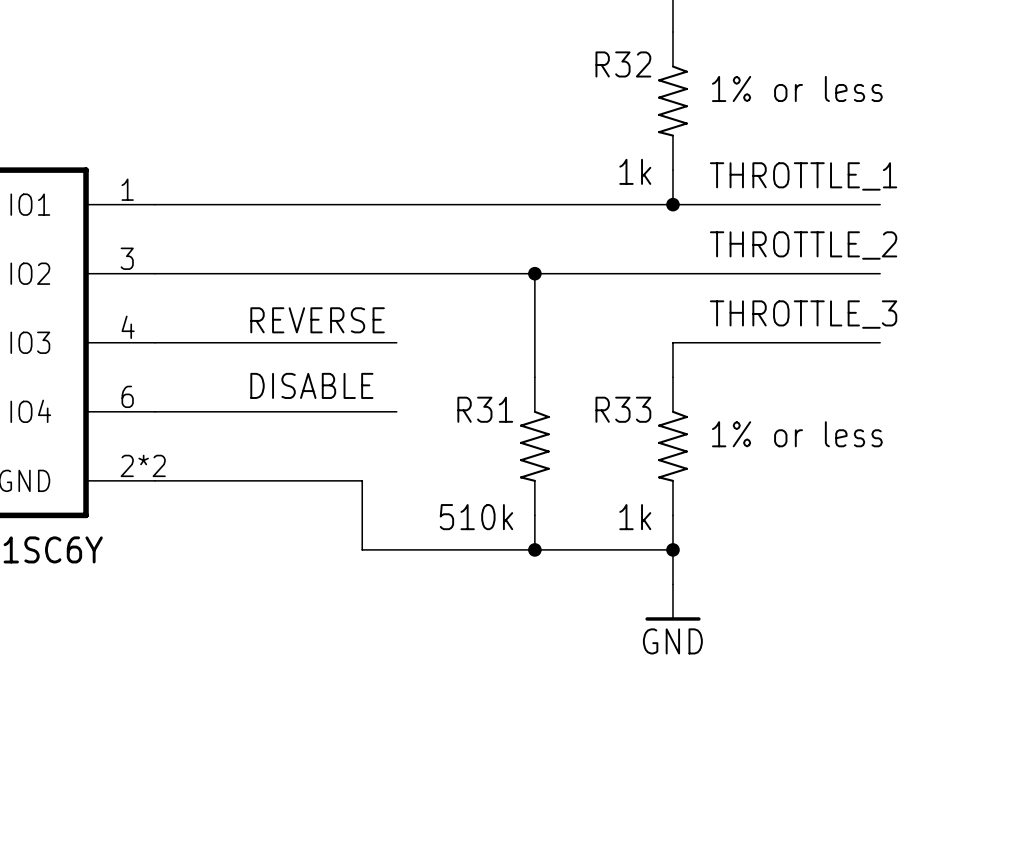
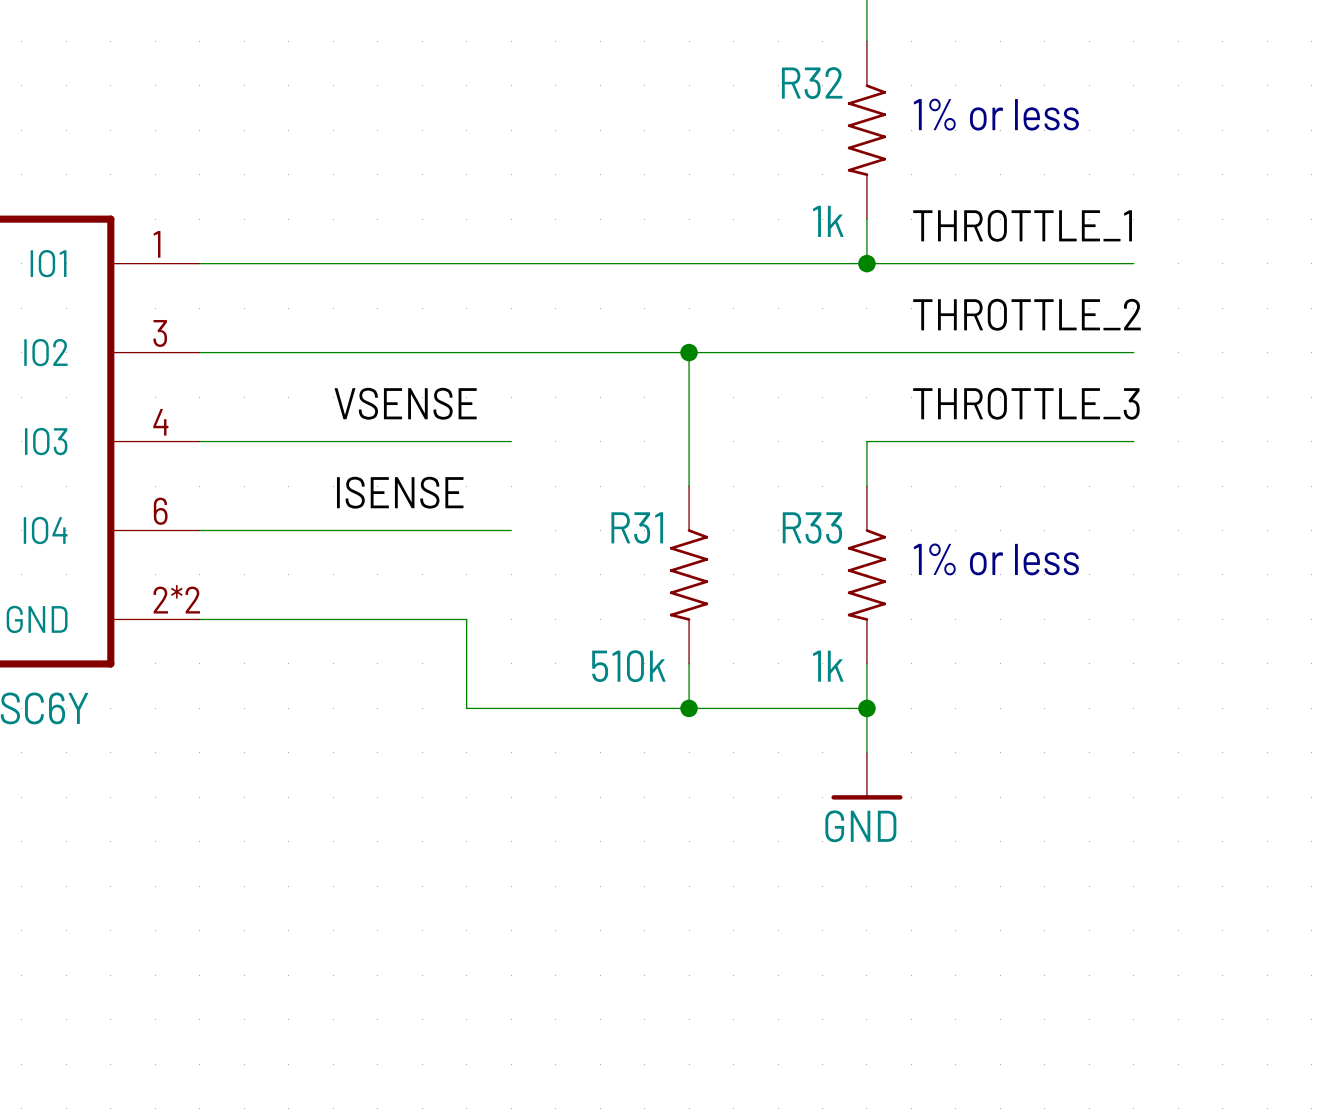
label: none -> VSENSE (405, 403)
label: REVERSE (317, 320) -> none
label: none -> ISENSE (400, 492)
label: DISABLE (311, 385) -> none

